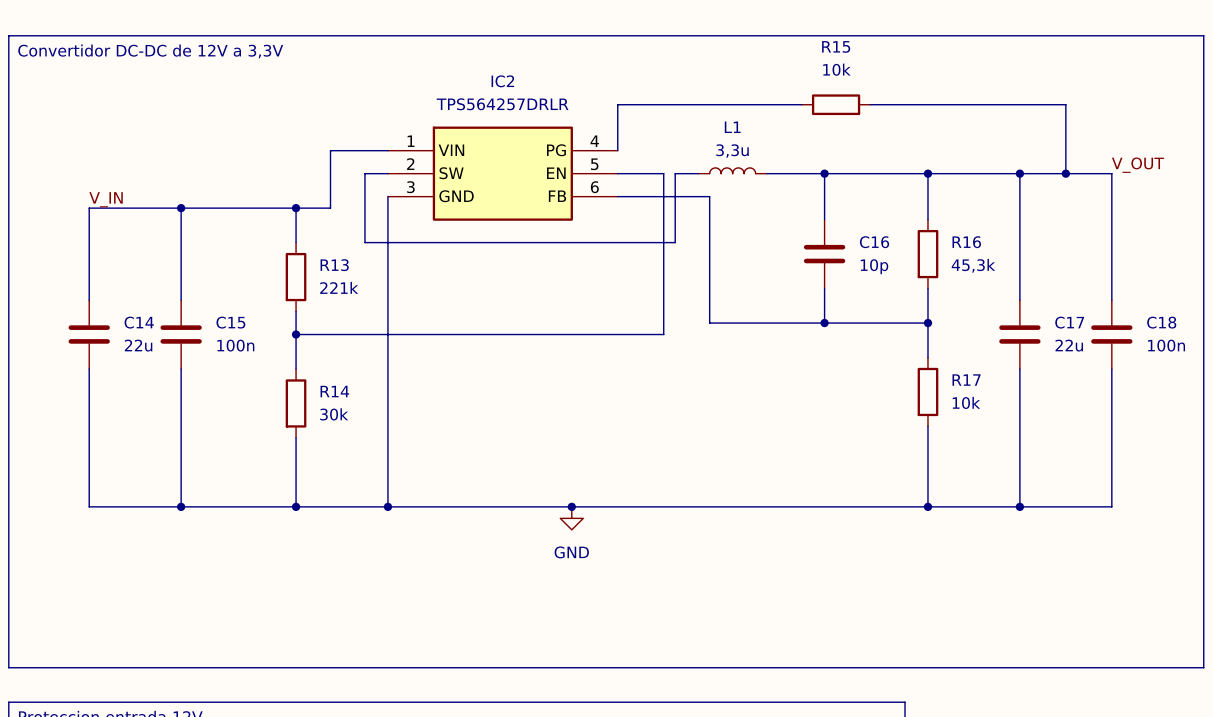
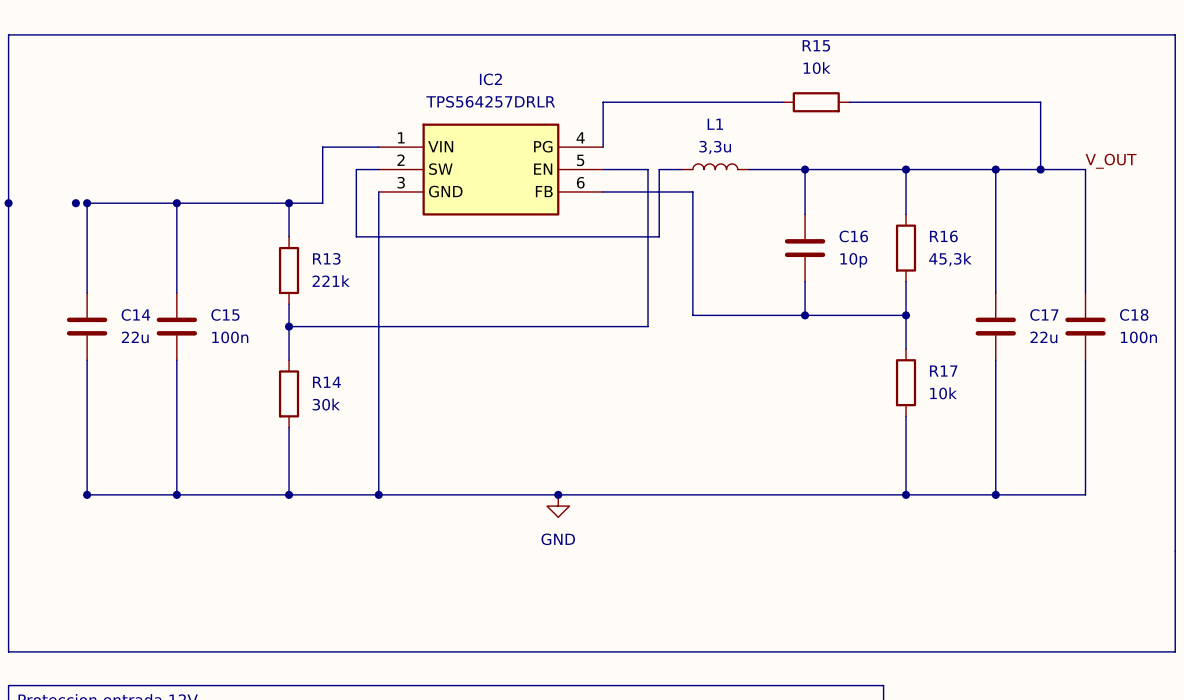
text: Convertidor DC-DC de 12V a 3,3V (150, 51) -> none
label: V_IN (106, 199) -> none
junction: none -> (8, 203)
junction: none -> (75, 203)
junction: none -> (87, 203)
junction: none -> (87, 494)

